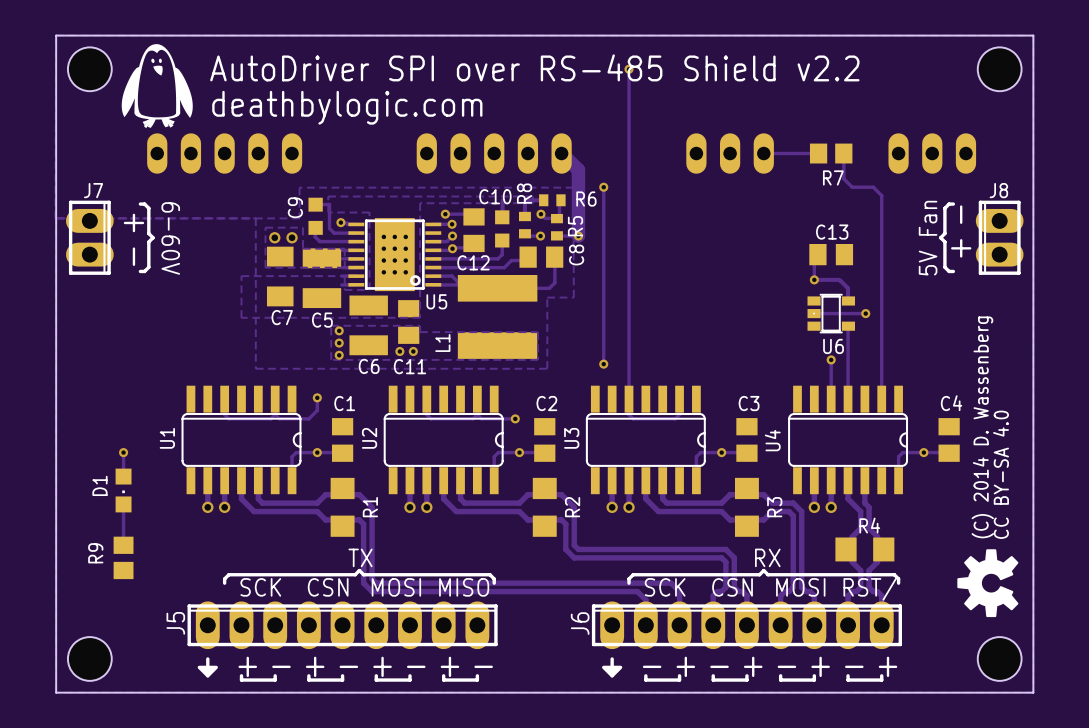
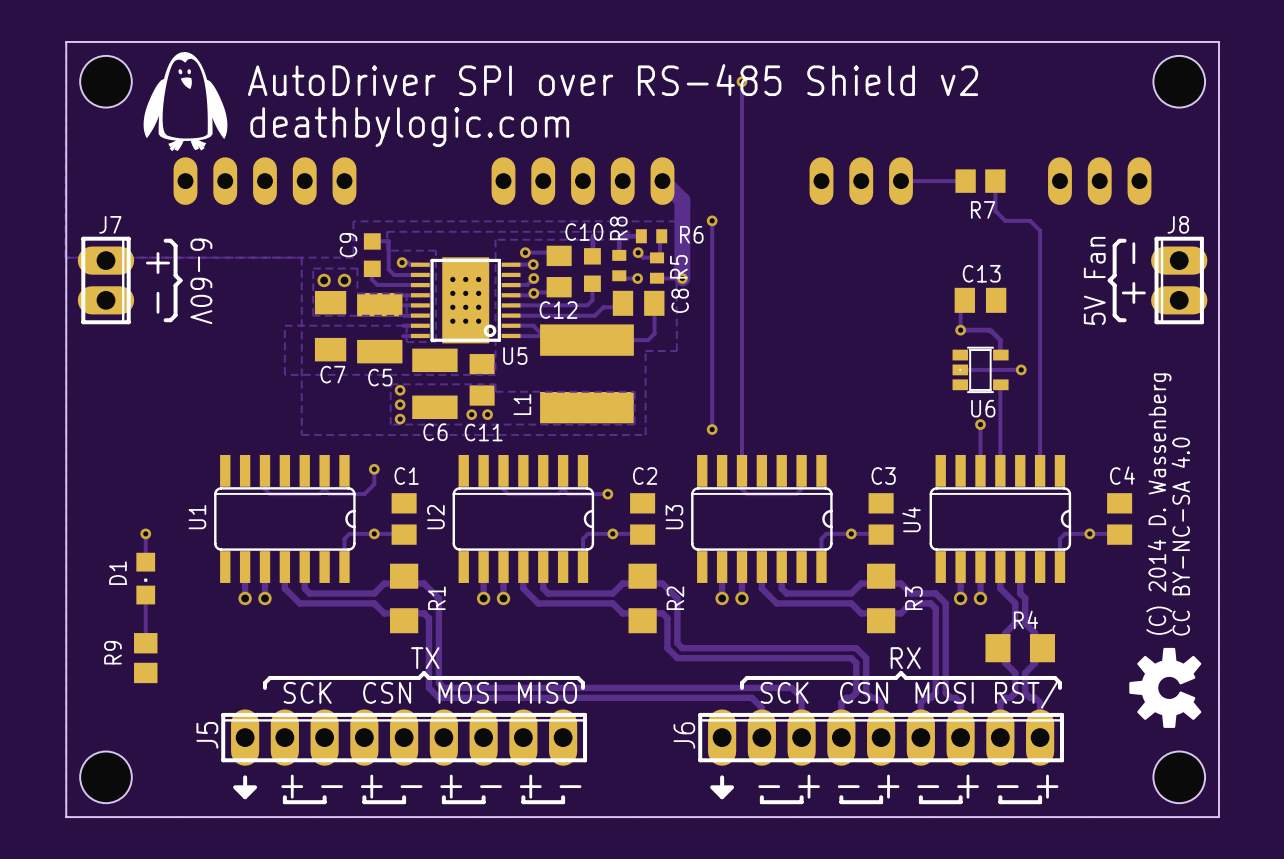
text: AutoDriver SPI over RS-485 Shield v2.2 (534, 67) -> AutoDriver SPI over RS-485 Shield v2 (613, 80)
text: CC BY-SA 4.0 (1001, 474) -> CC BY-NC-SA 4.0 (1180, 536)

